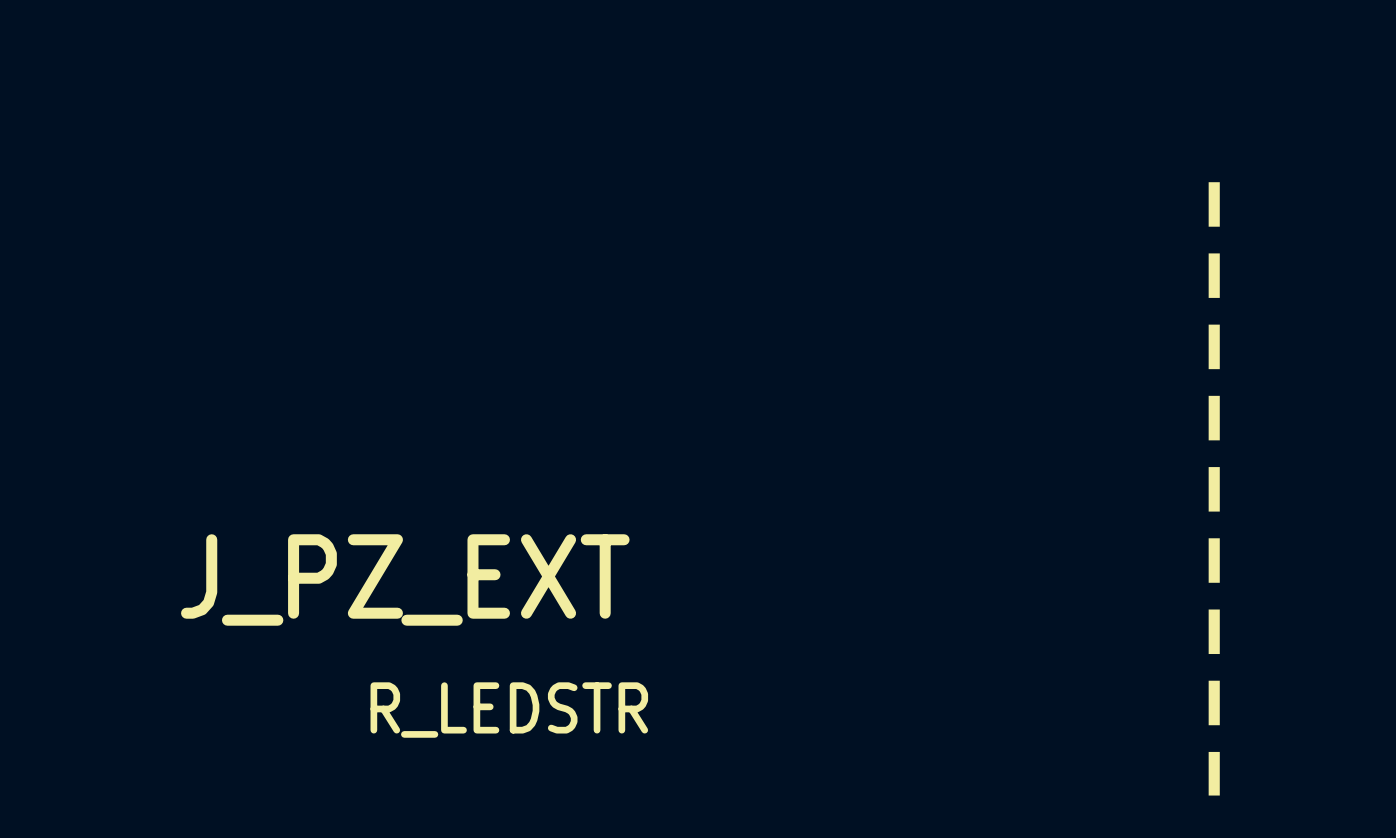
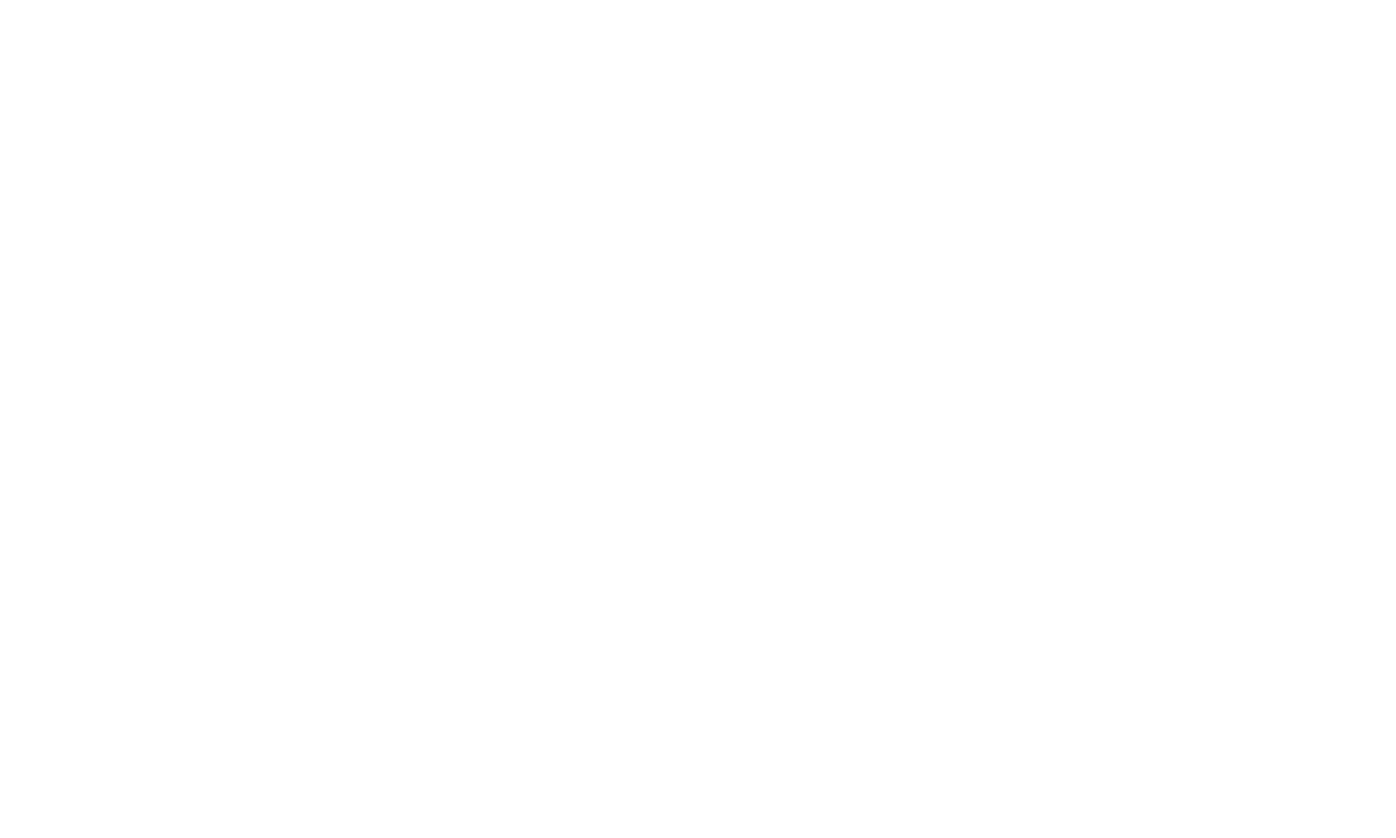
line: (1214, 182) (1214, 795) -> none
text: J_PZ_EXT (405, 579) -> none
text: R_LEDSTR (509, 710) -> none

